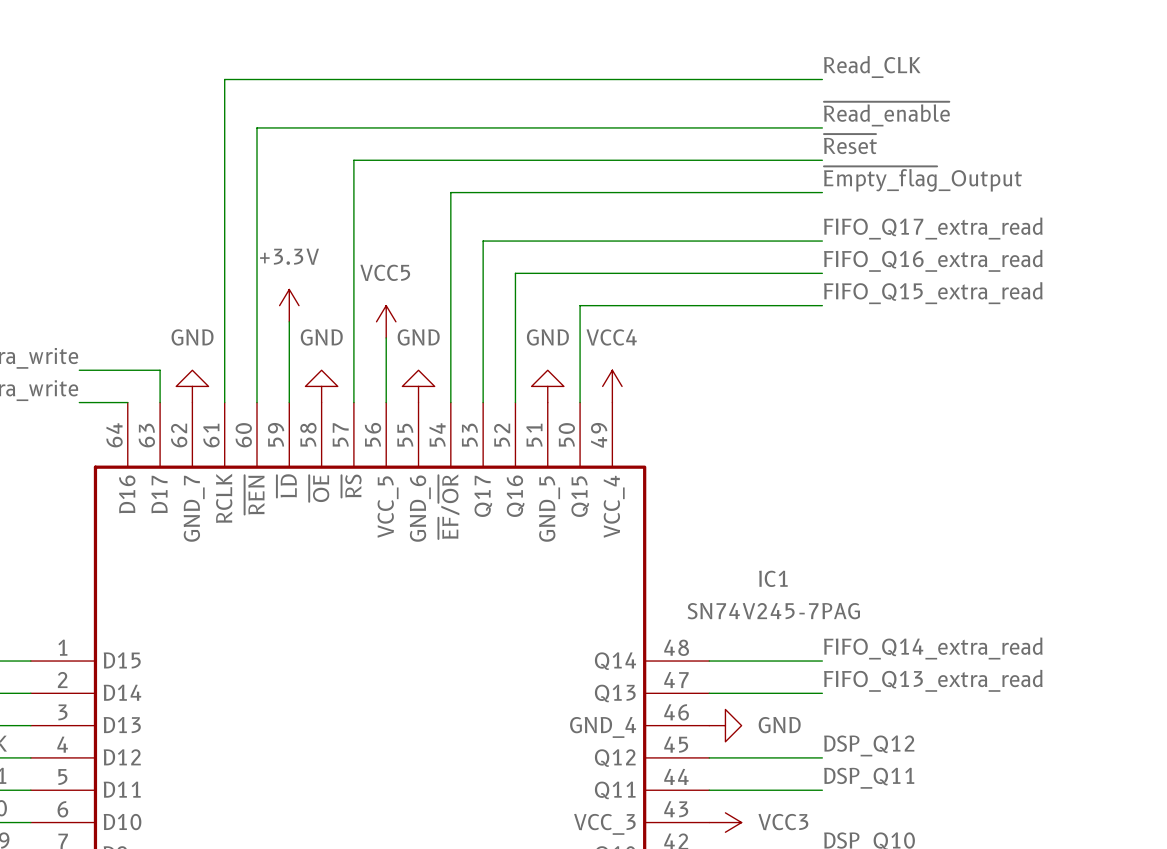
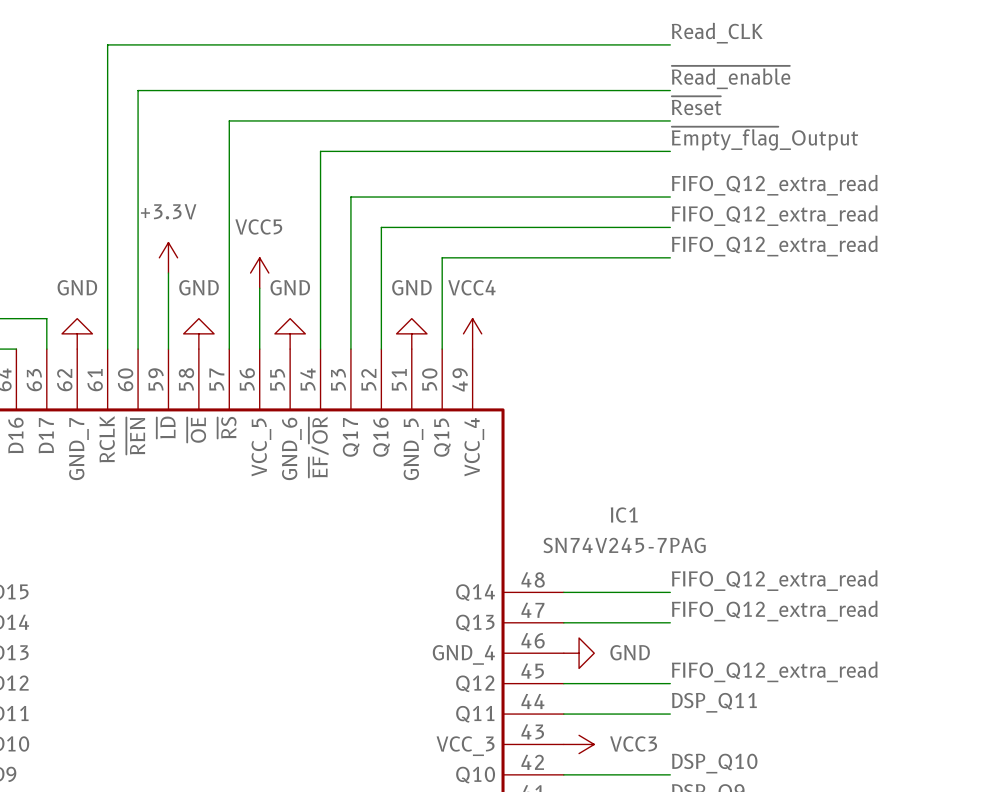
label: FIFO_Q17_extra_read (933, 228) -> FIFO_Q12_extra_read (774, 185)
label: FIFO_Q16_extra_read (933, 260) -> FIFO_Q12_extra_read (774, 215)
label: FIFO_Q15_extra_read (933, 293) -> FIFO_Q12_extra_read (774, 246)
label: FIFO_Q14_extra_read (933, 648) -> FIFO_Q12_extra_read (774, 580)
label: FIFO_Q13_extra_read (933, 680) -> FIFO_Q12_extra_read (774, 611)
label: DSP_Q12 (869, 745) -> FIFO_Q12_extra_read (774, 671)

